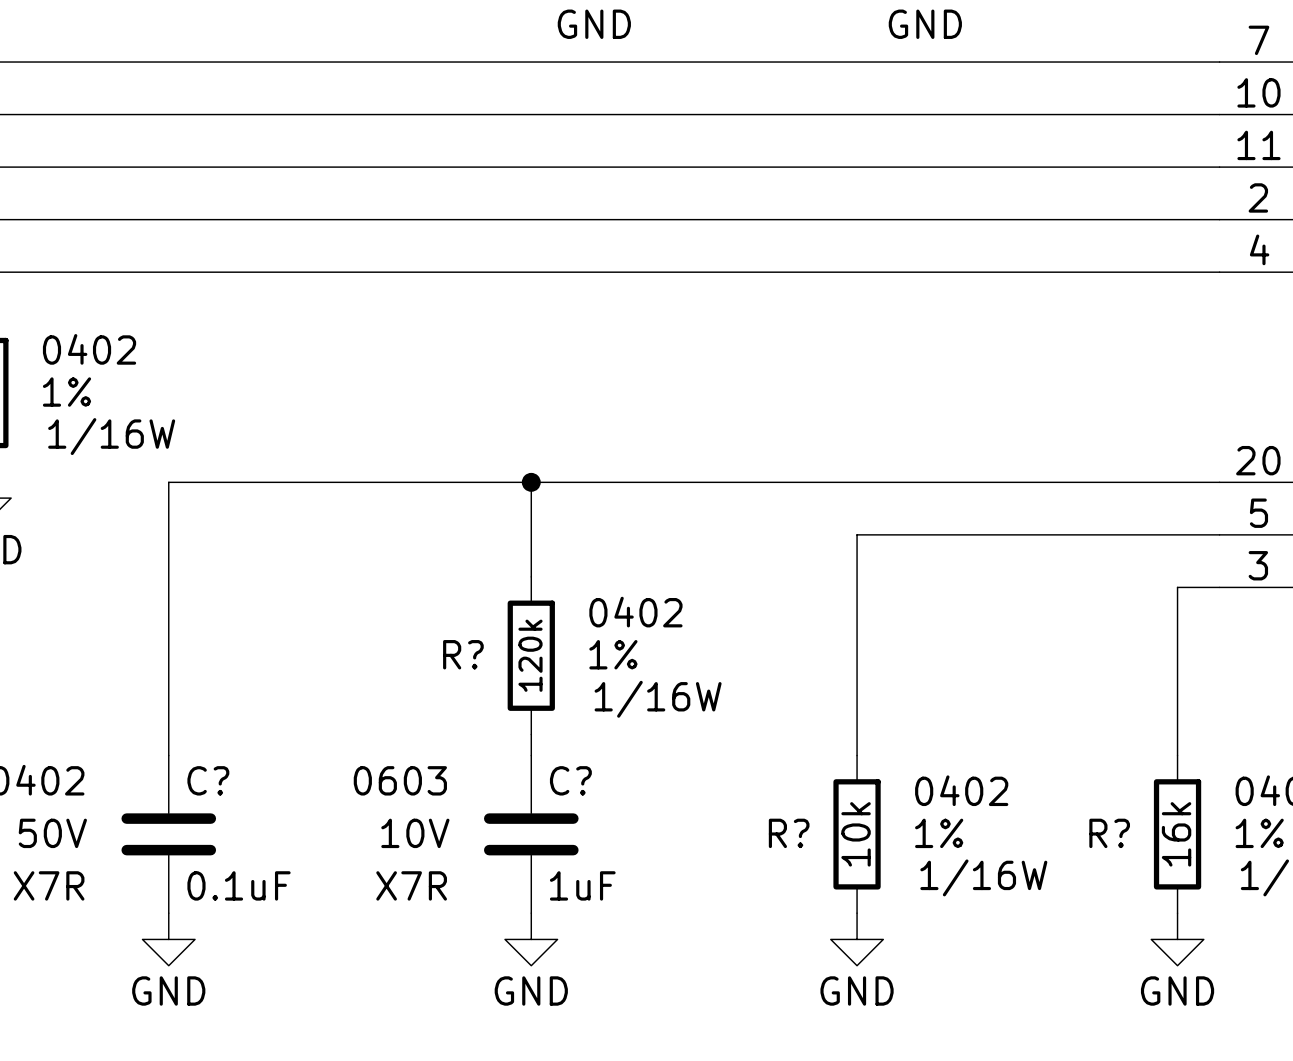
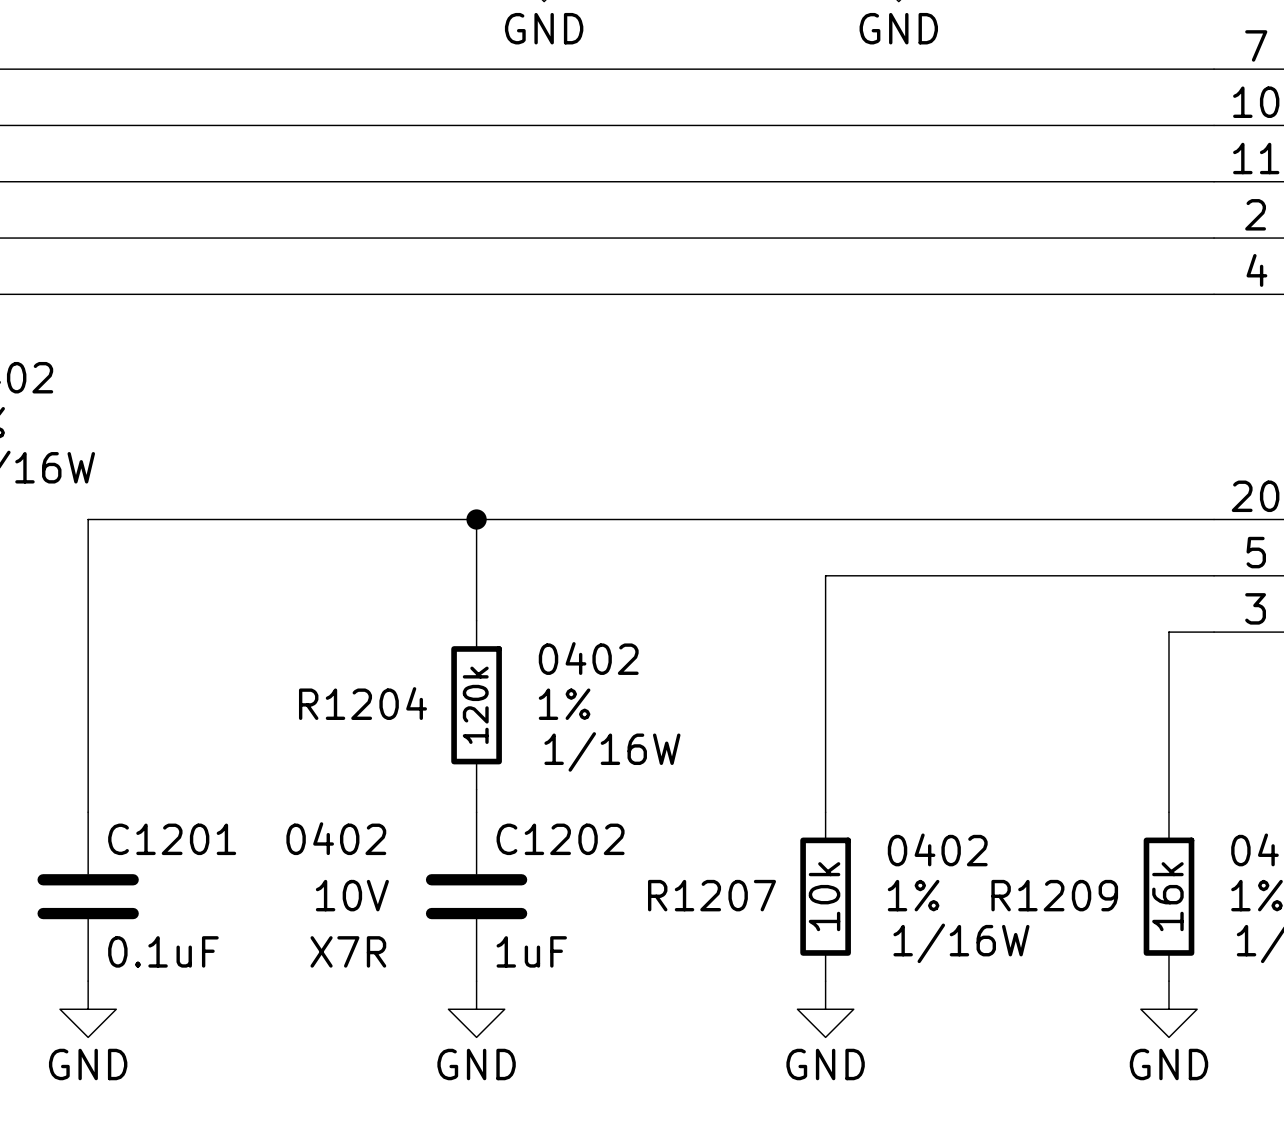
R? name: R? (463, 654) -> R1204 (362, 703)
C? name: C? (208, 780) -> C1201 (172, 839)
C? text: 0603 (400, 780) -> 0402 (336, 838)
C? name: C? (570, 780) -> C1202 (560, 839)
R? name: R? (789, 833) -> R1207 (712, 895)
R? name: R? (1109, 833) -> R1209 (1054, 895)

